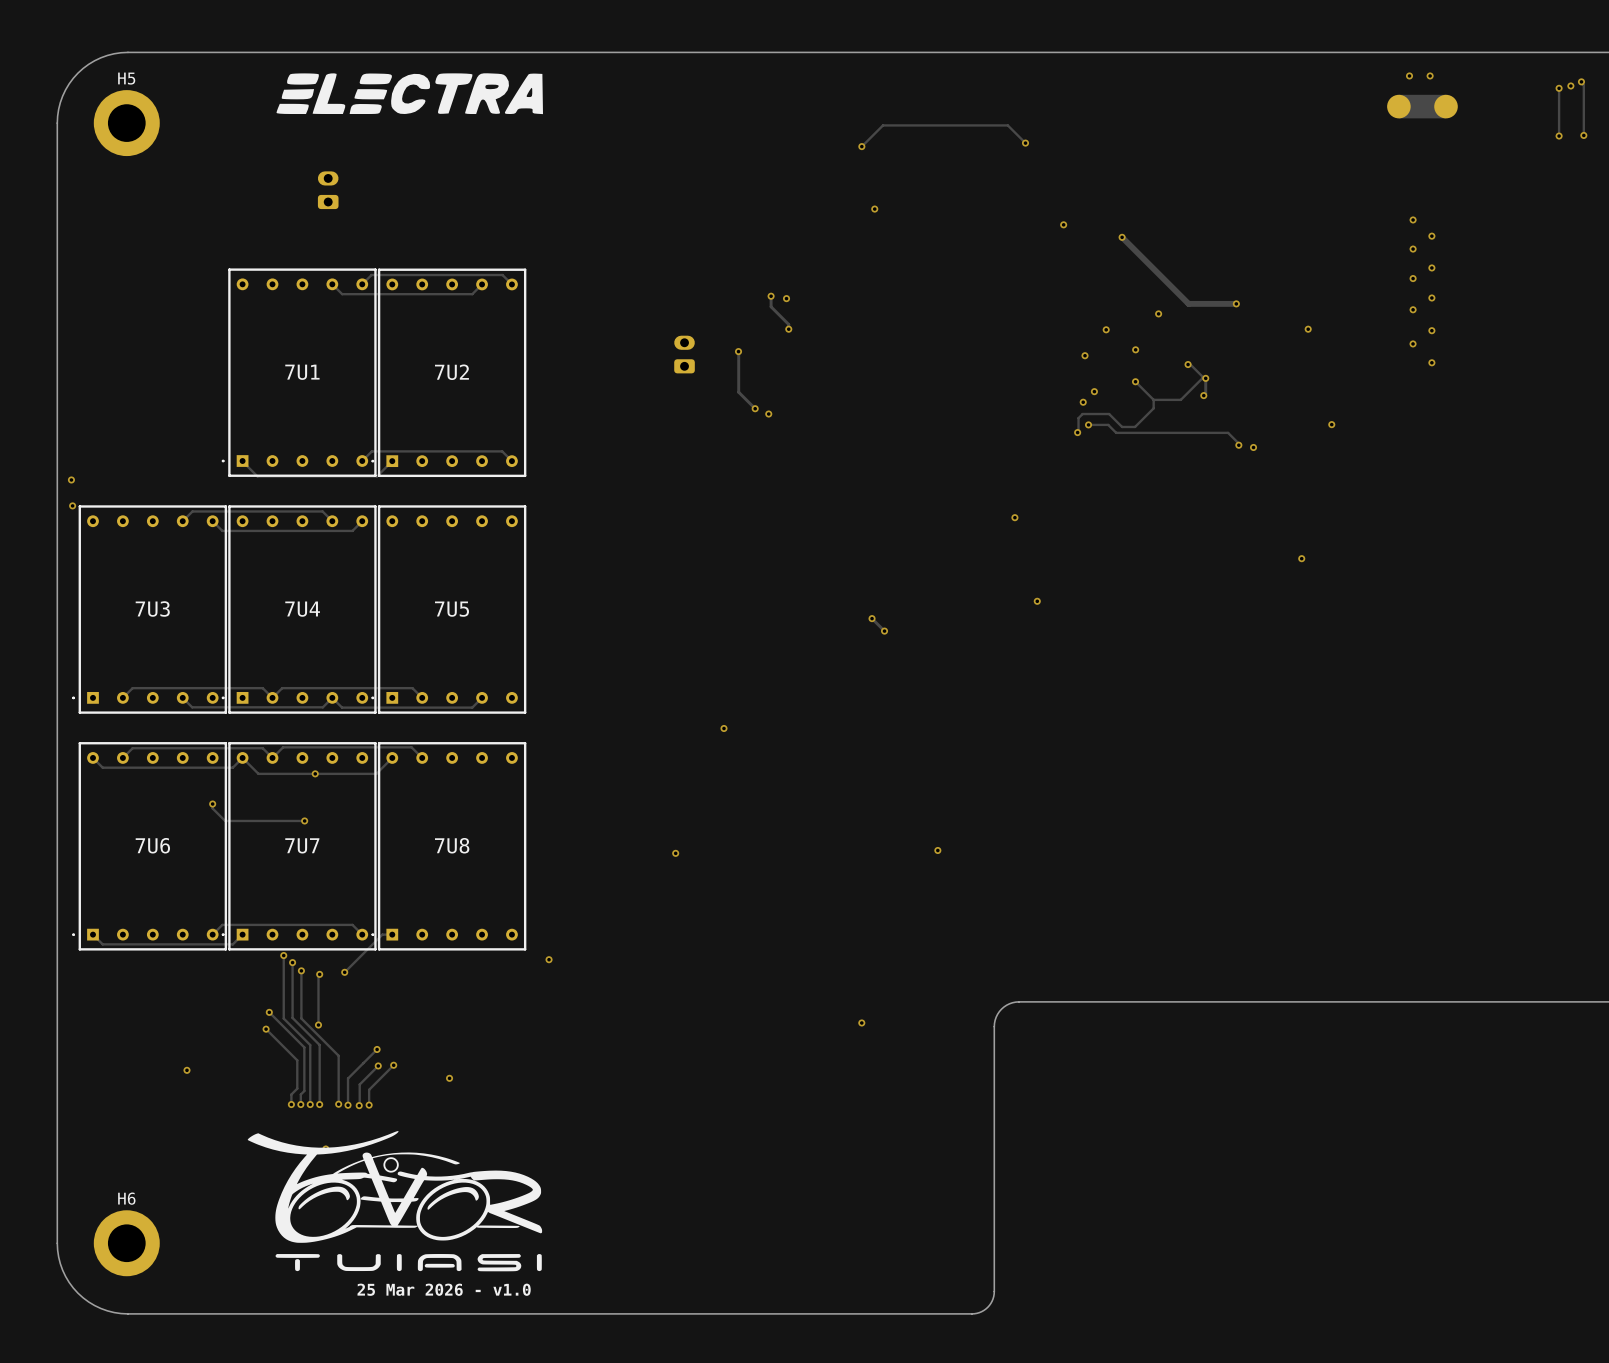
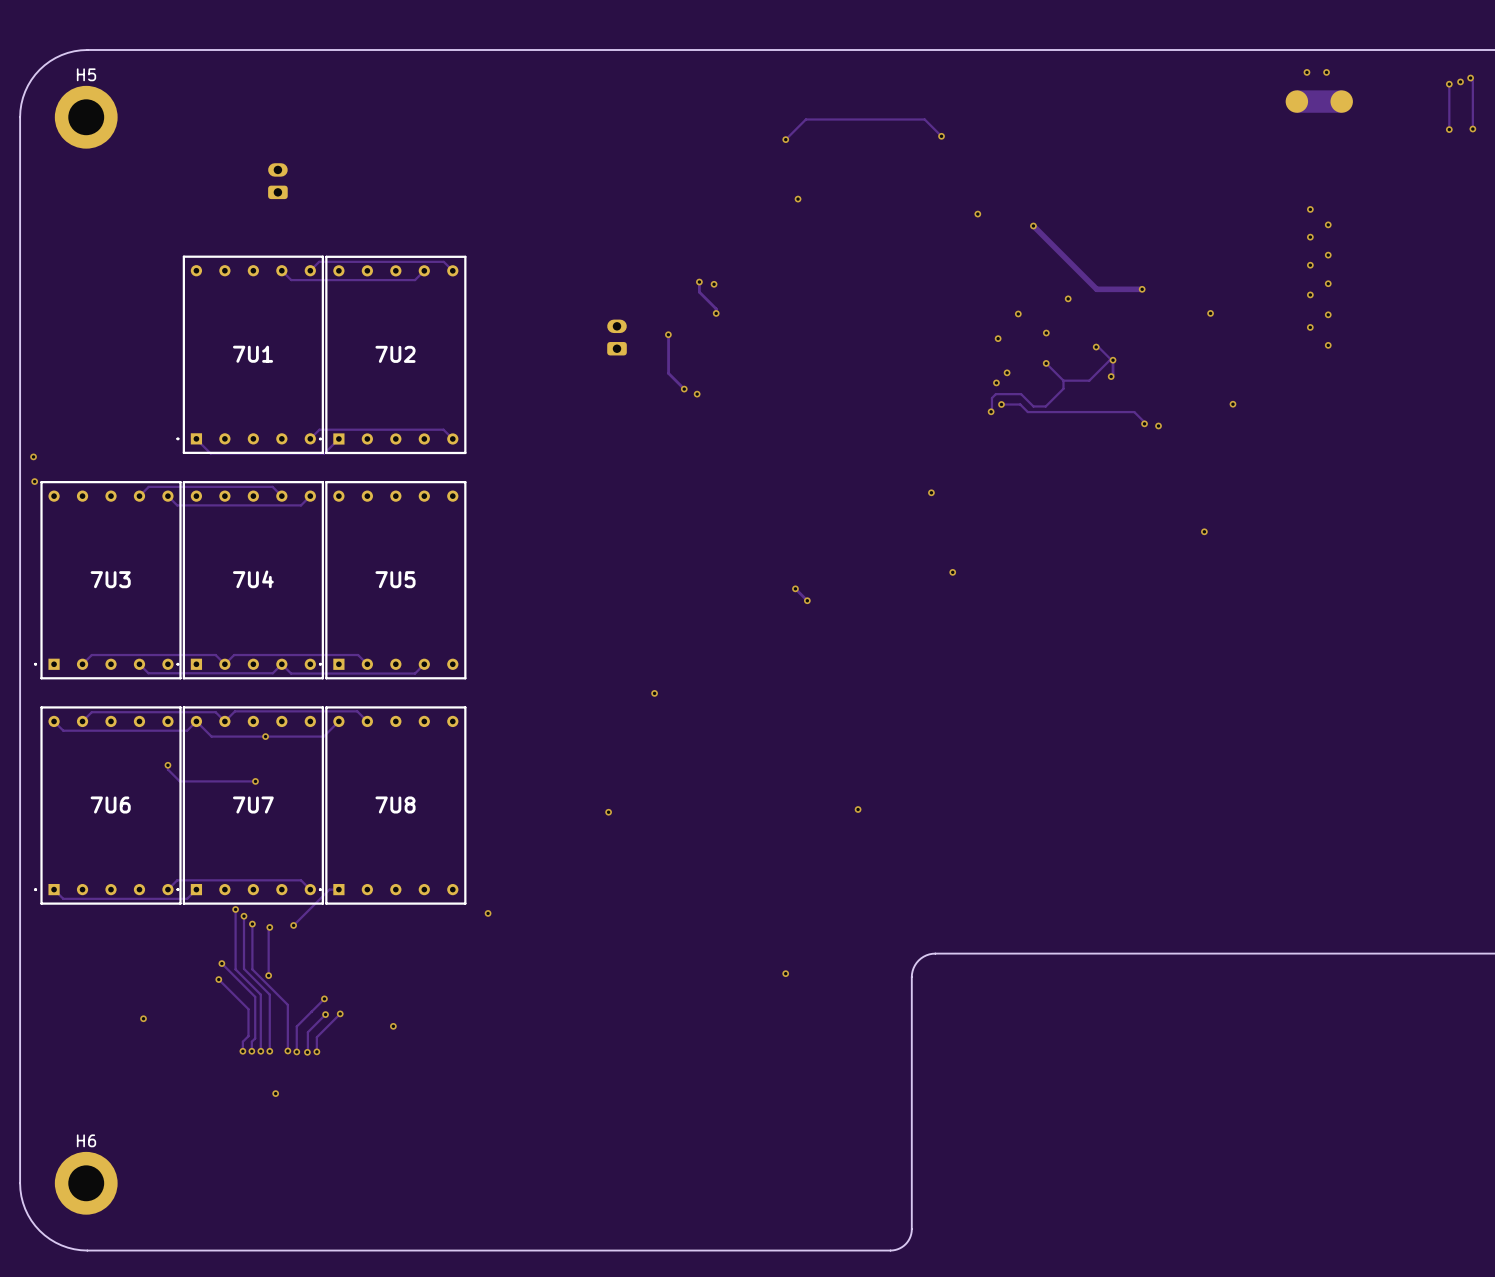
drawing: [276, 73, 544, 115] -> none
drawing: [247, 1131, 543, 1272] -> none
text: 25 Mar 2026 - v1.0 (444, 1289) -> none

